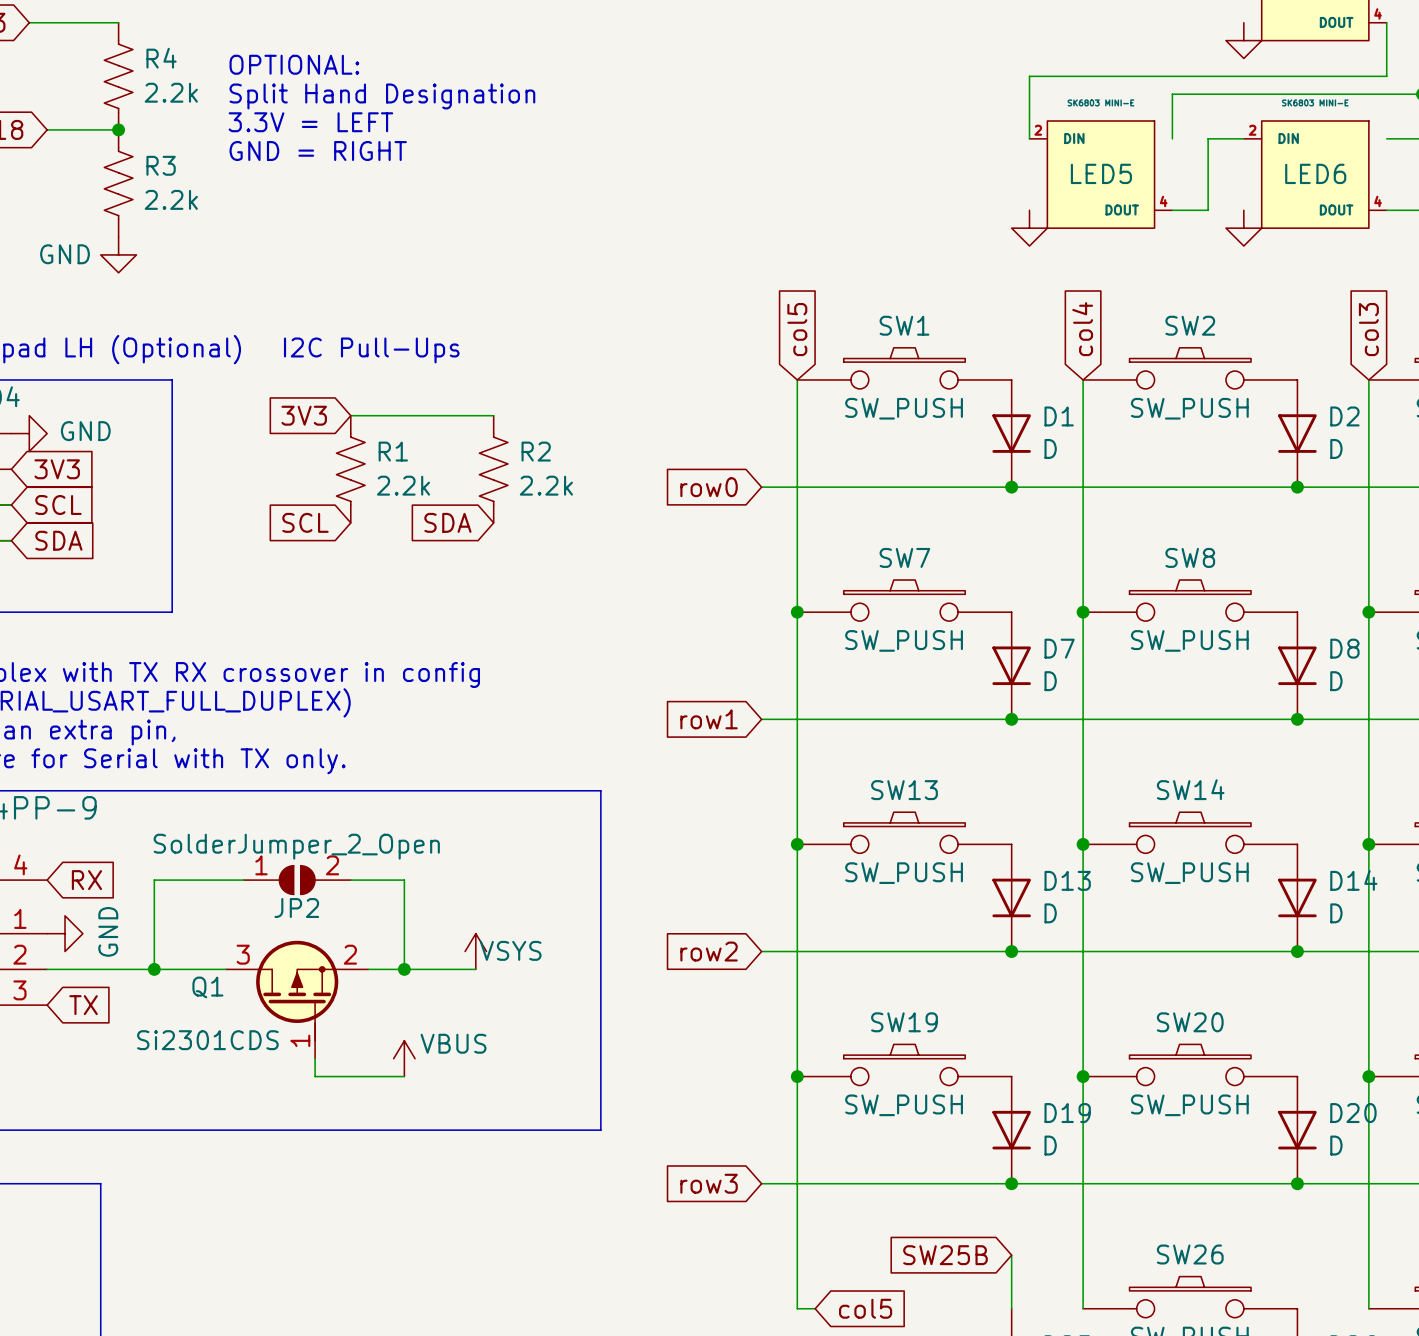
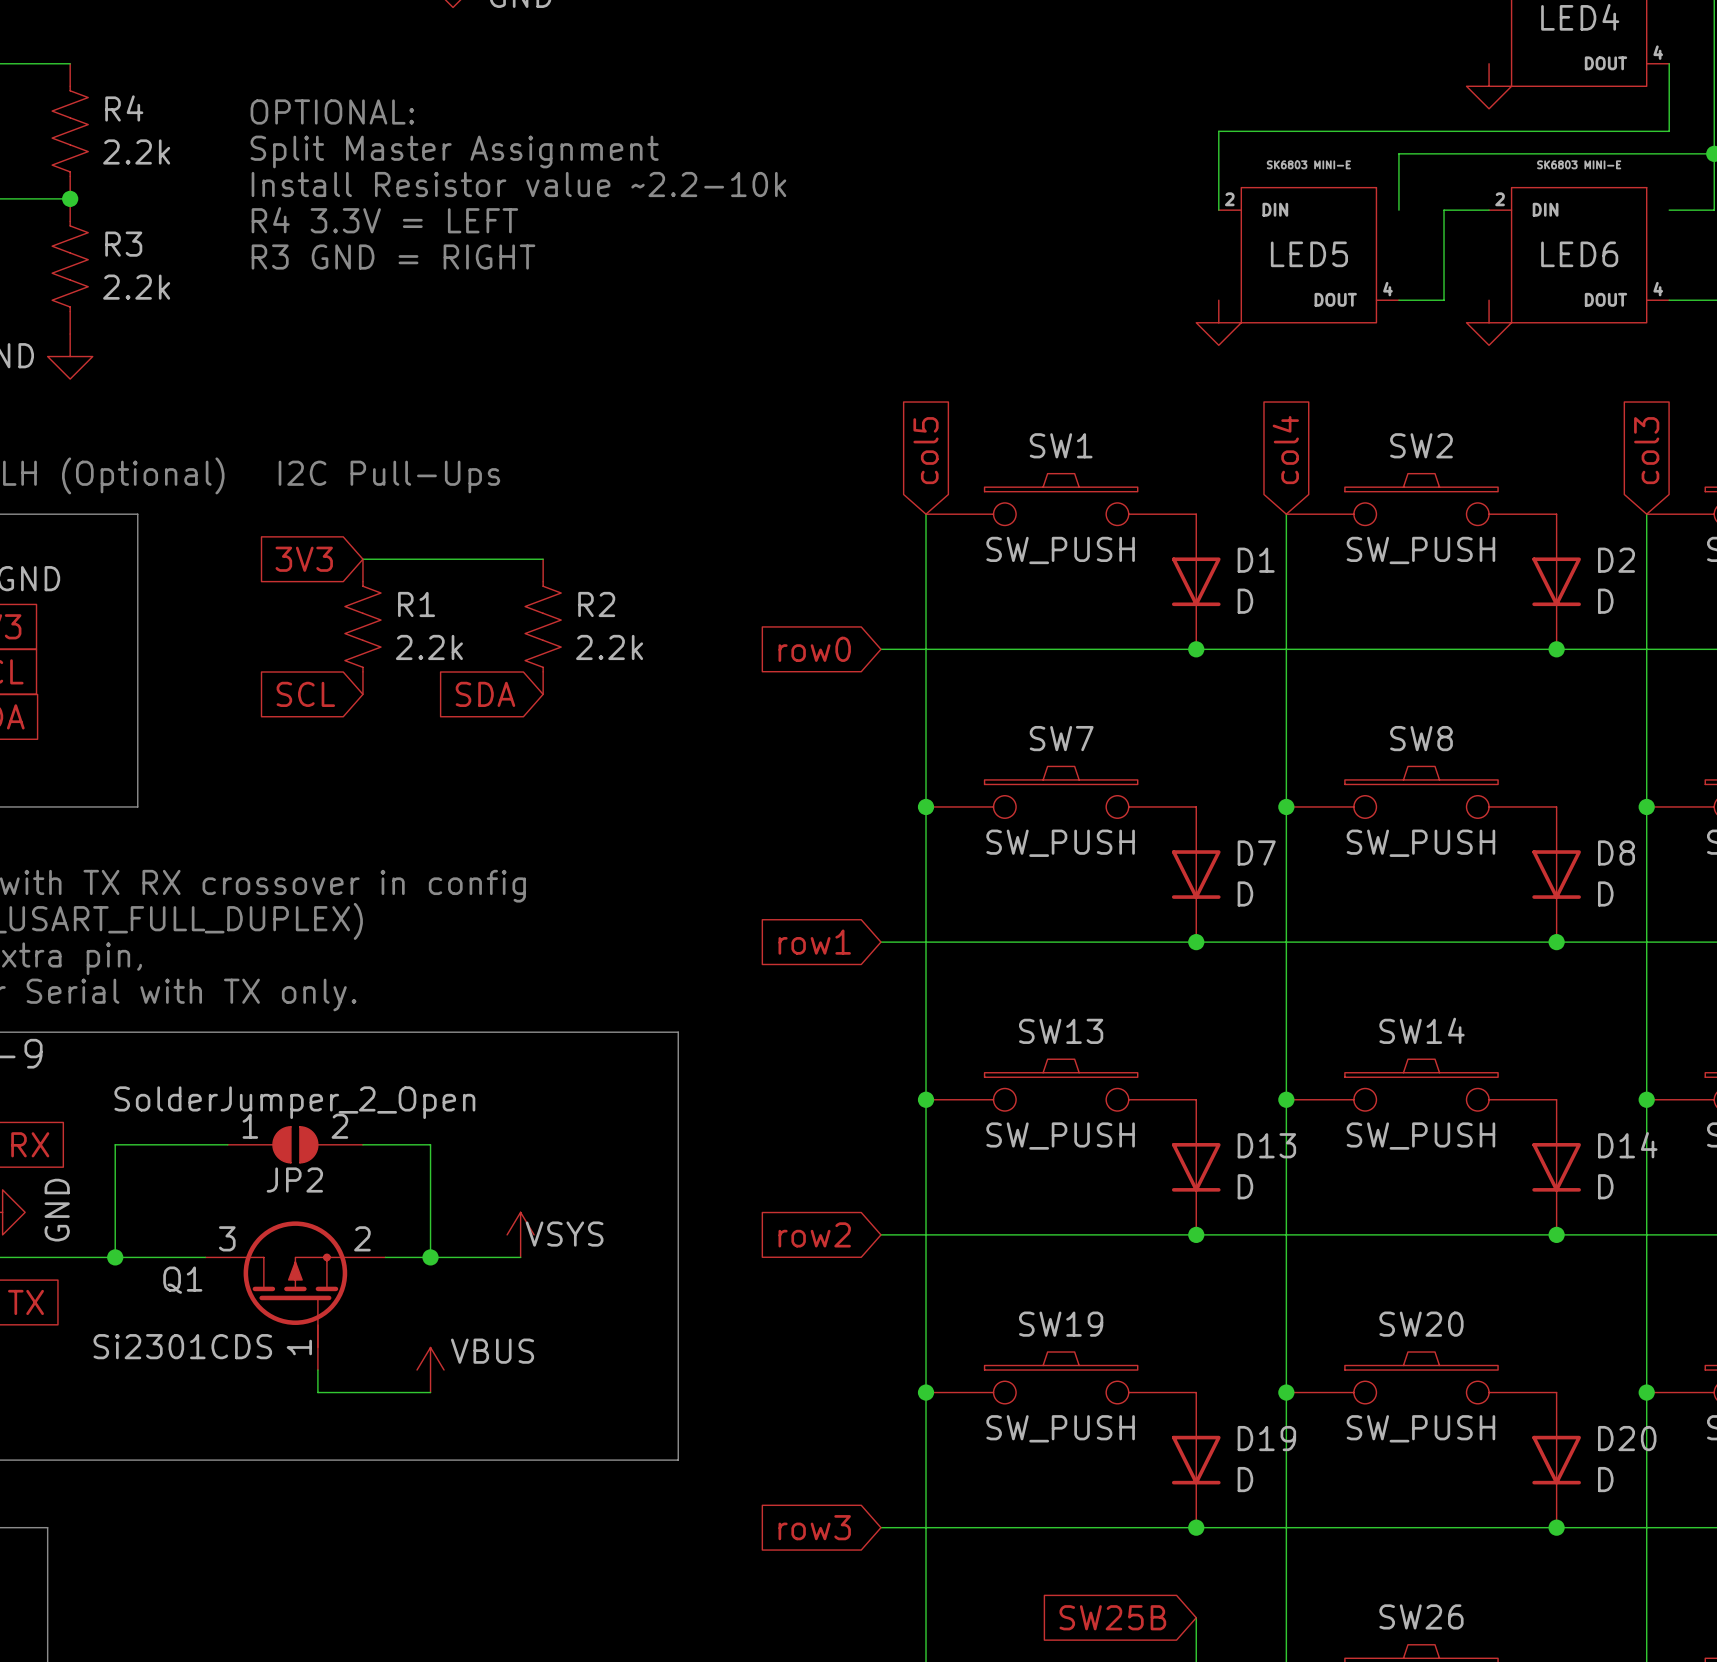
text position: OPTIONAL: (294, 64) -> OPTIONAL: (332, 111)
text: none -> Split Master Assignment (454, 151)
text: Split Hand Designation (382, 96) -> none
text: none -> Install Resistor value ~2.2-10k (518, 184)
text: 3.3V = LEFT (310, 122) -> R4 3.3V = LEFT (384, 220)
text: GND = RIGHT (318, 151) -> R3 GND = RIGHT (393, 257)

